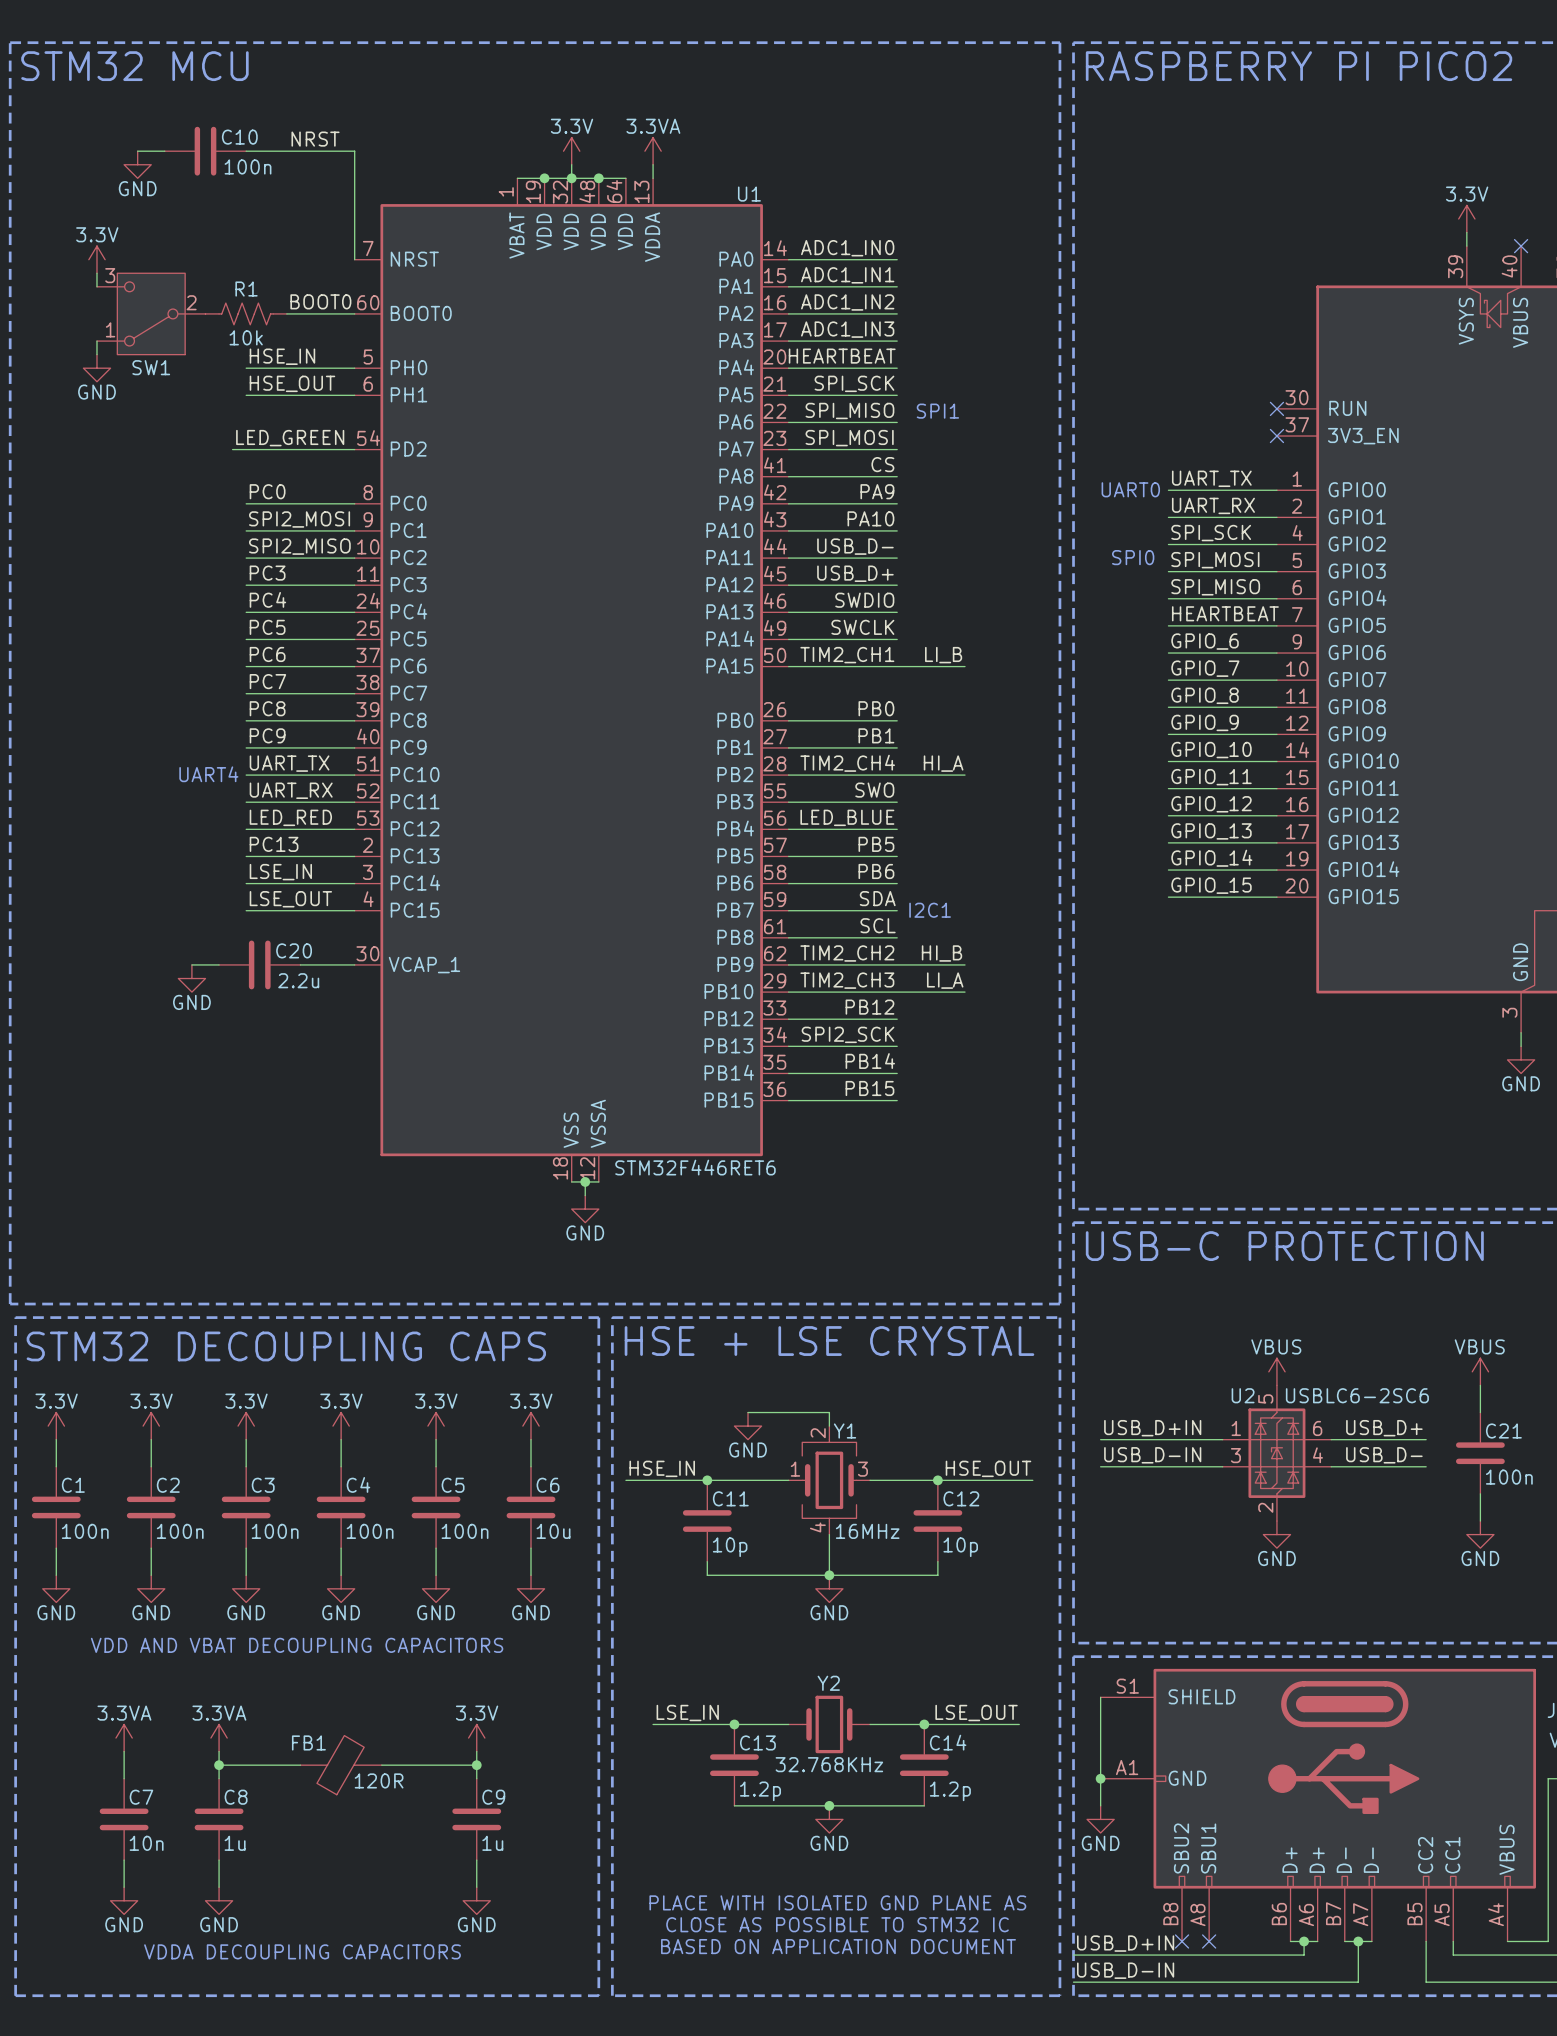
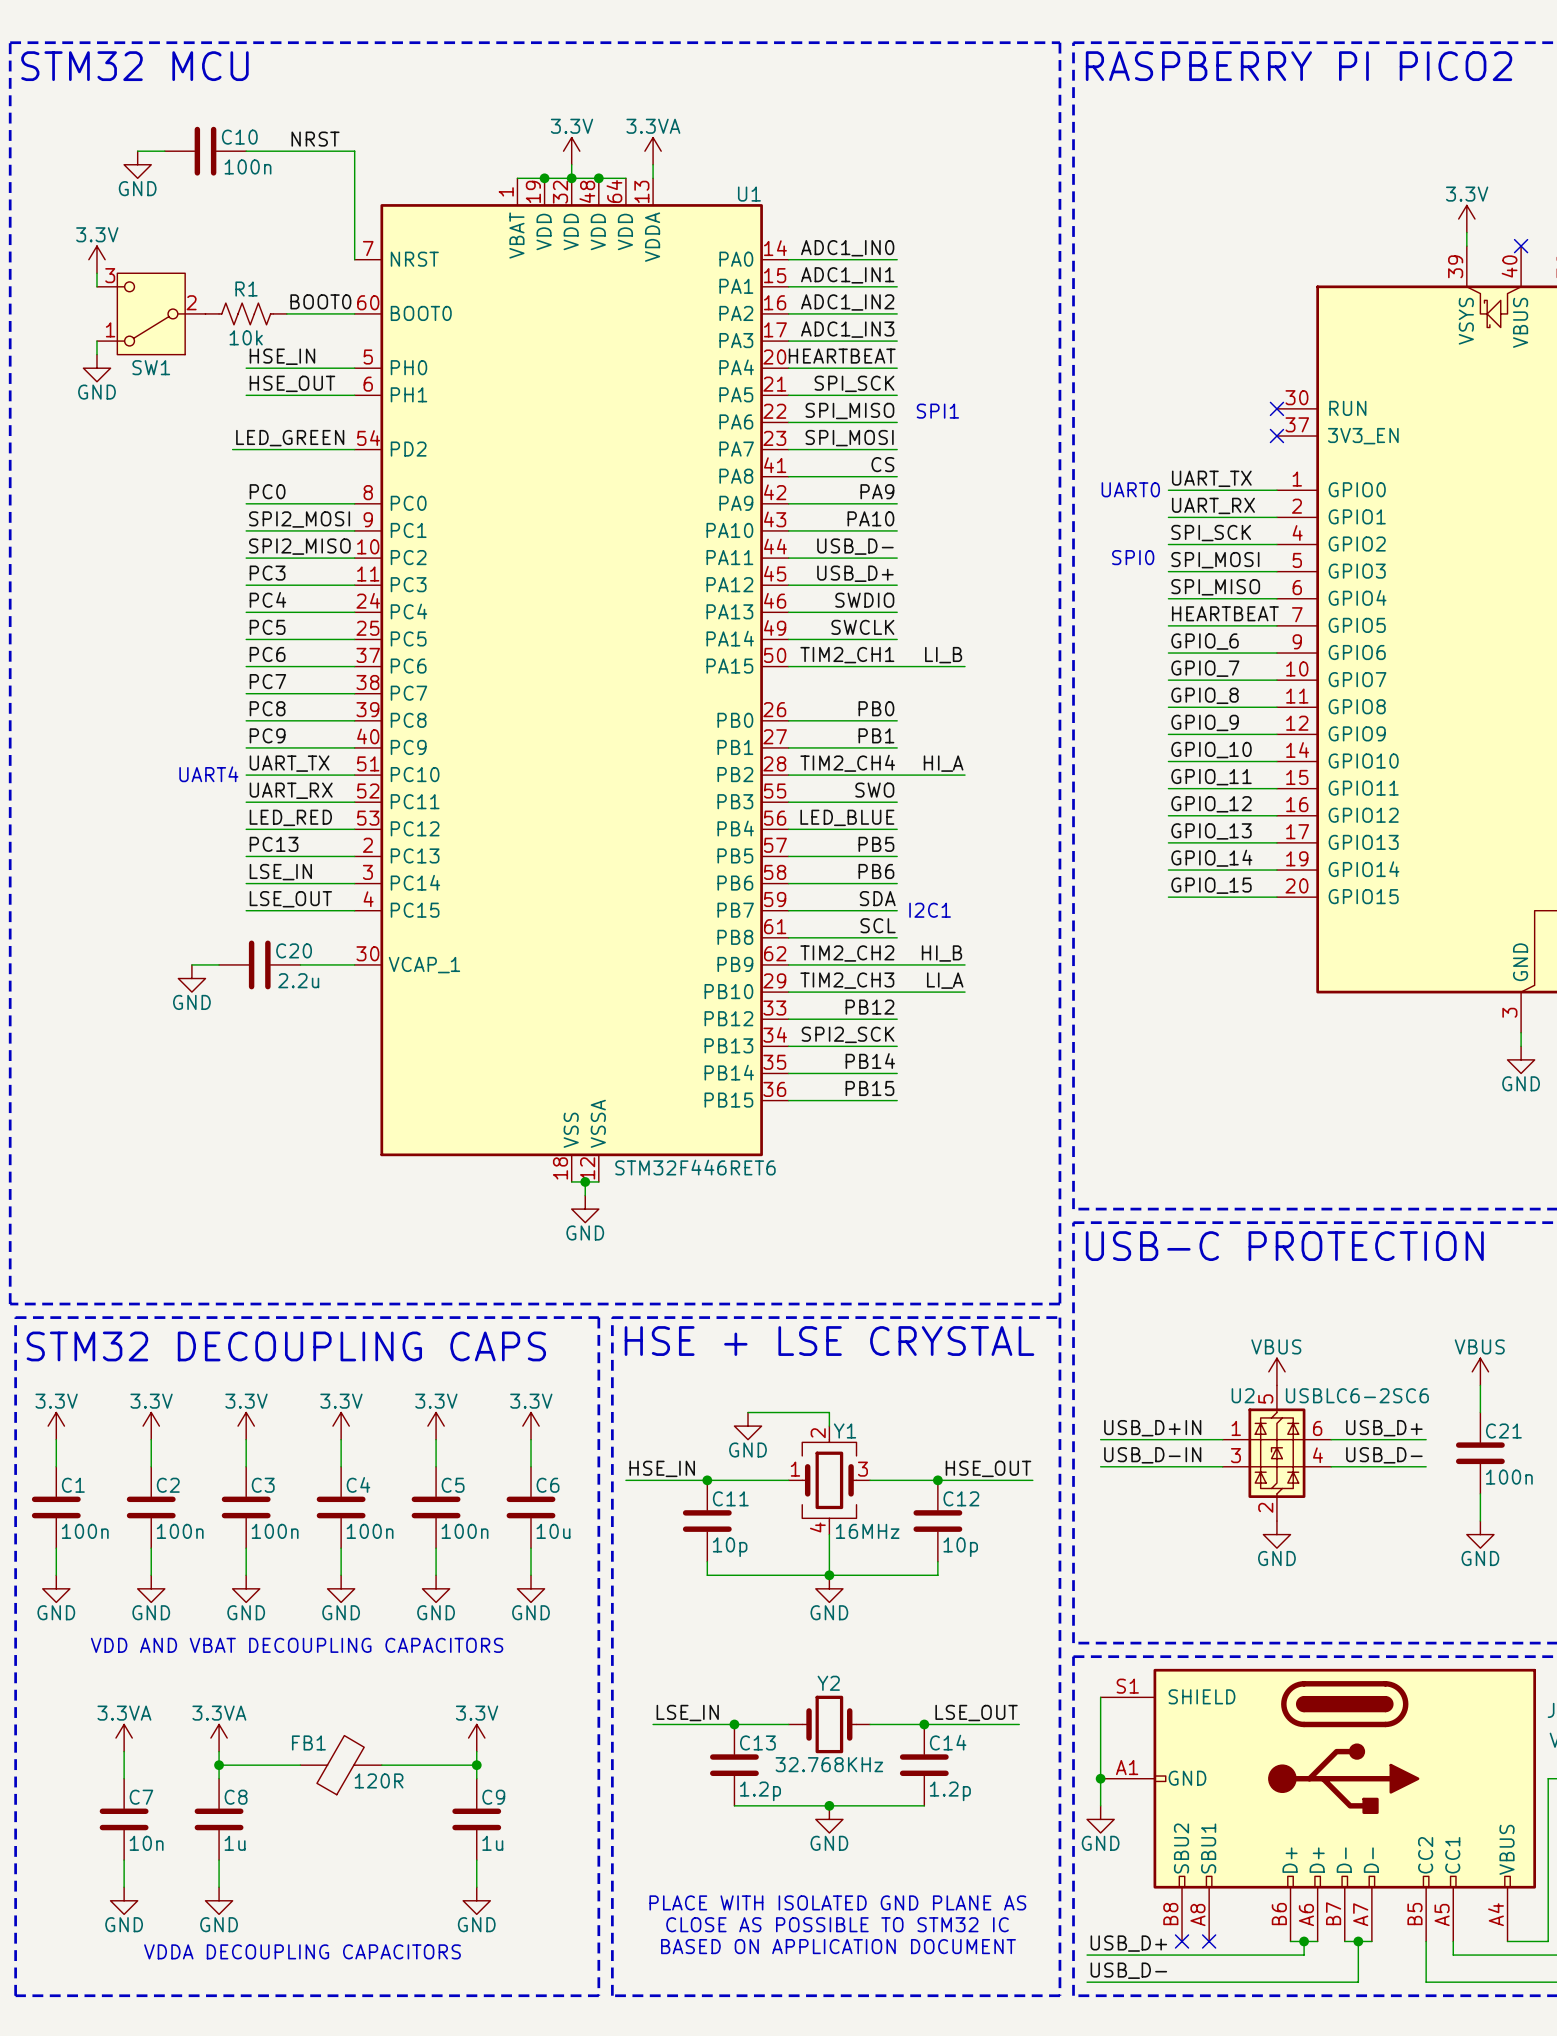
label: USB_D+IN (1125, 1943) -> USB_D+ (1128, 1943)
wire: (1073, 1955) (1087, 1955) -> none
label: USB_D-IN (1125, 1970) -> USB_D- (1128, 1970)
wire: (1073, 1982) (1087, 1982) -> none

